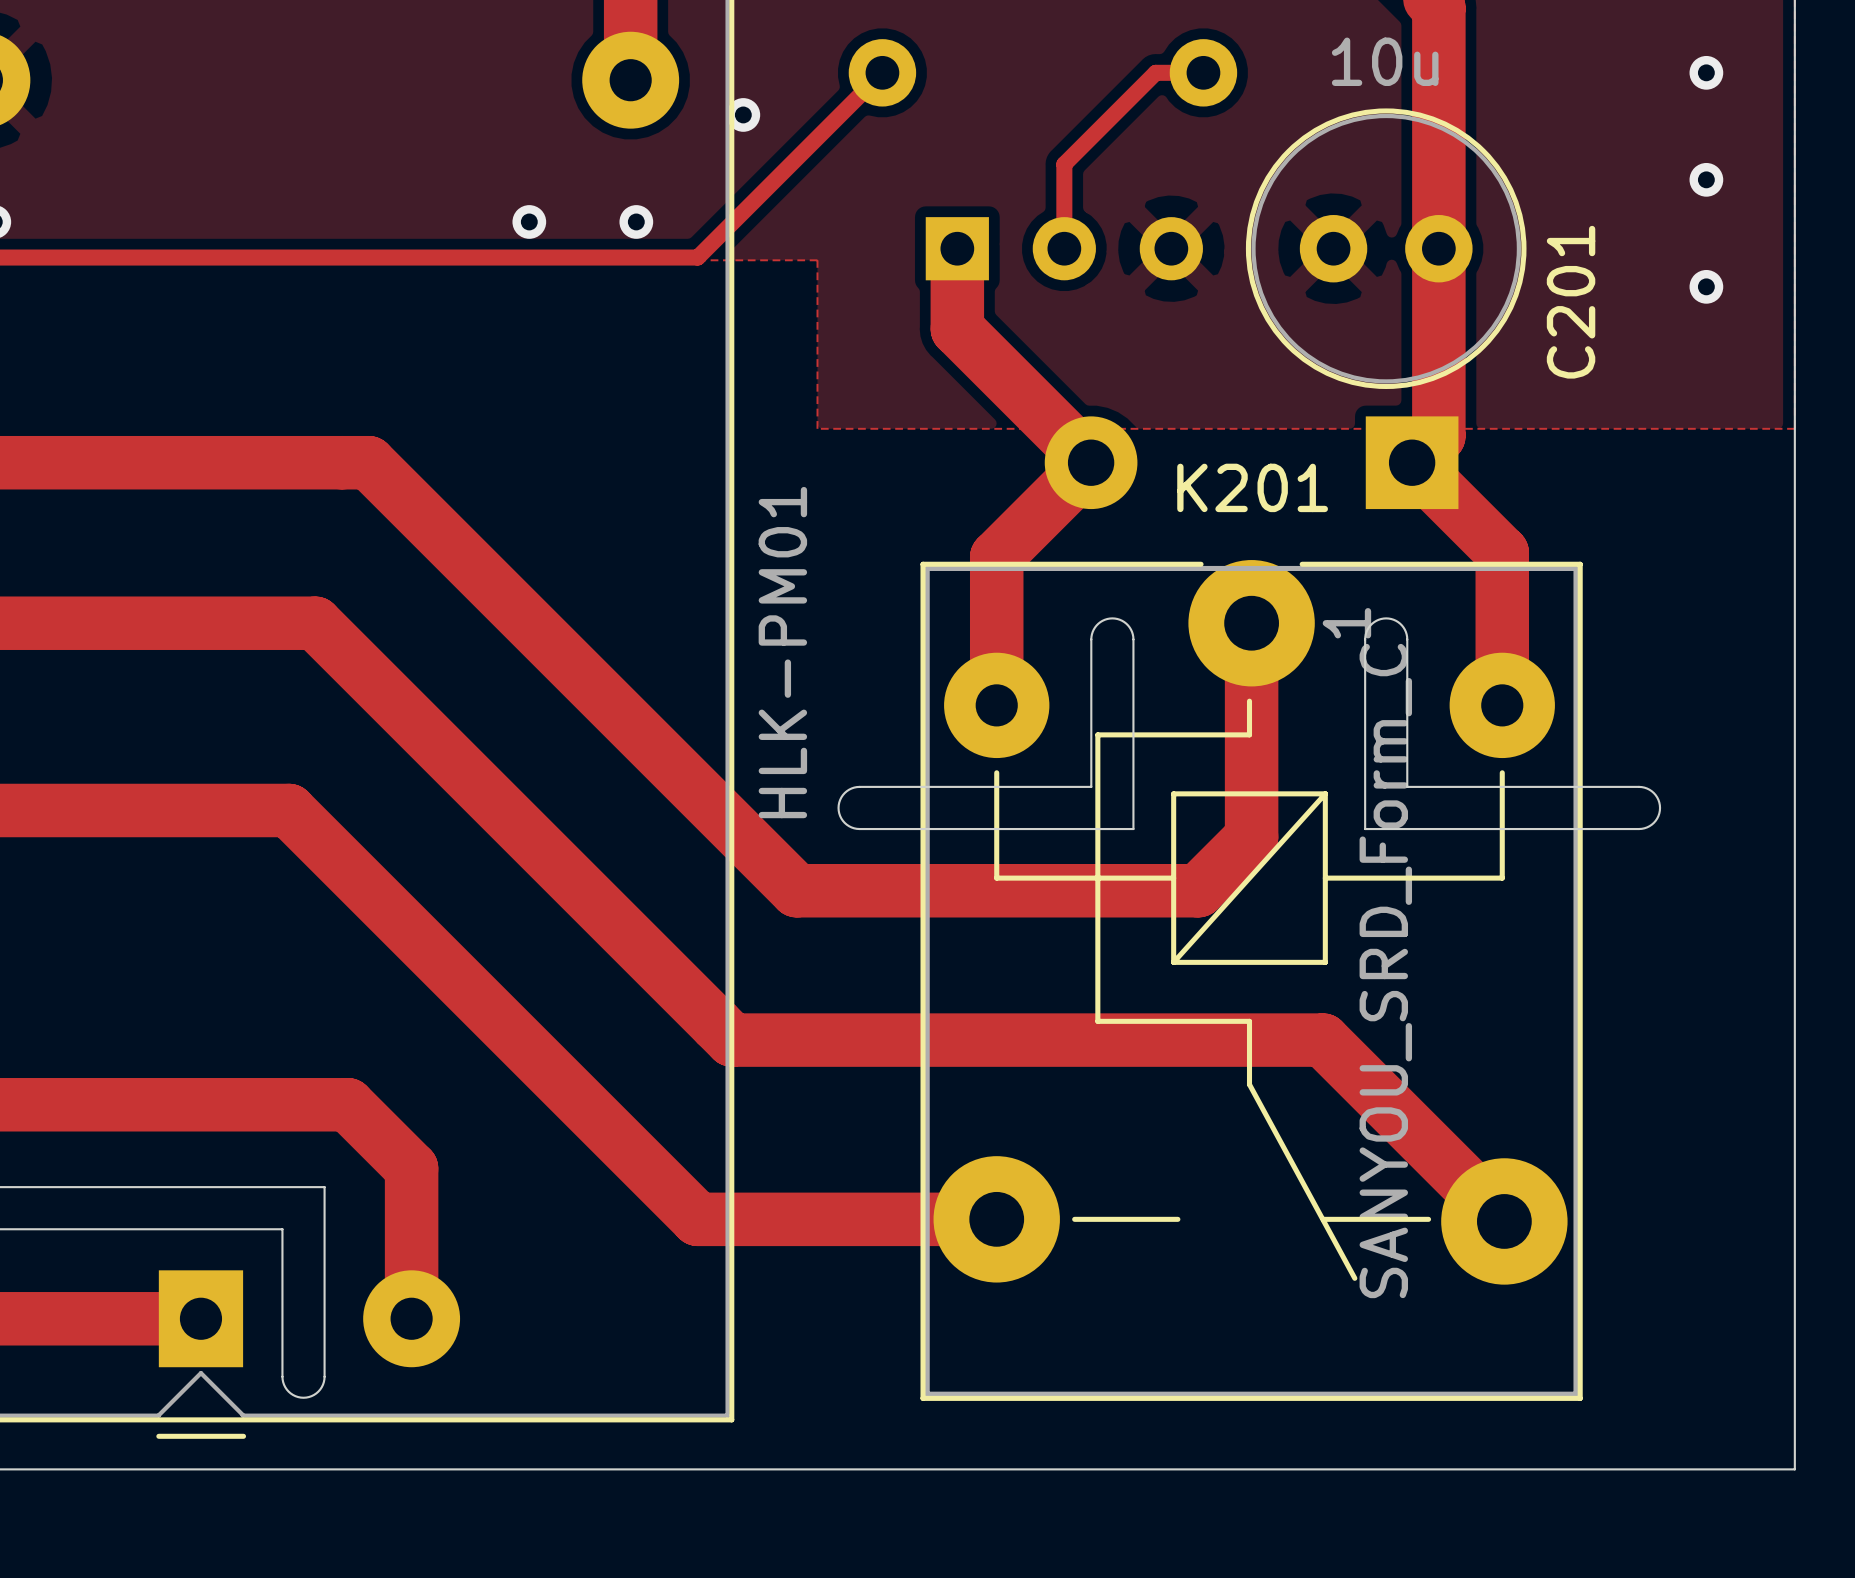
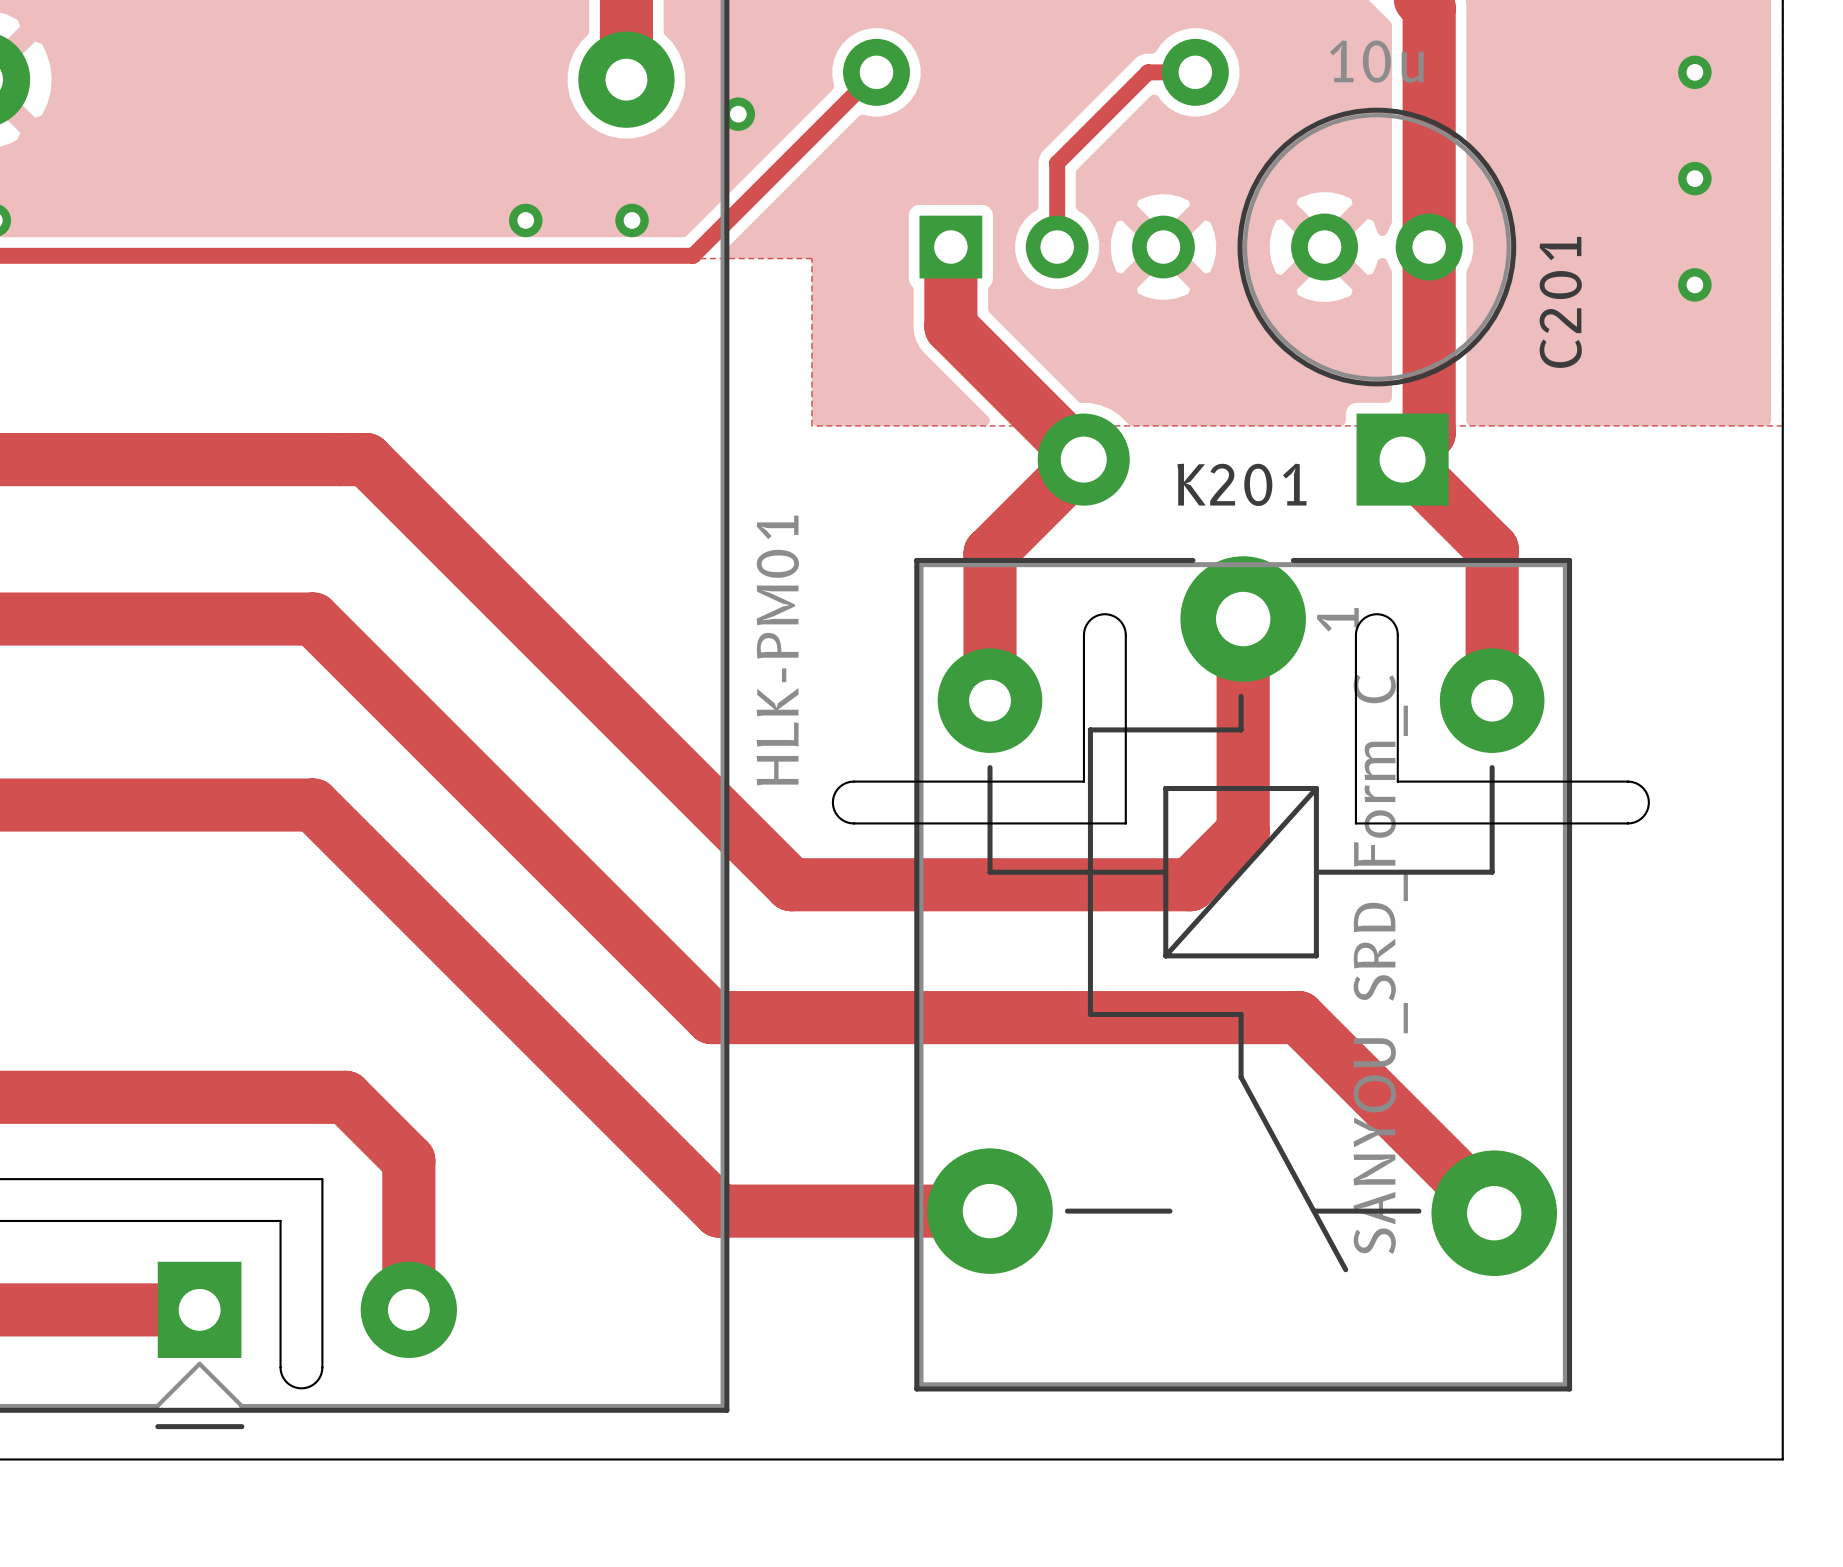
track: (289, 810) (697, 1219) (724, 1219) -> (287, 805) (313, 805) (719, 1211)
track: (716, 1024) (732, 1040) (1323, 1040) -> (711, 1017) (1298, 1017) (1314, 1033)

